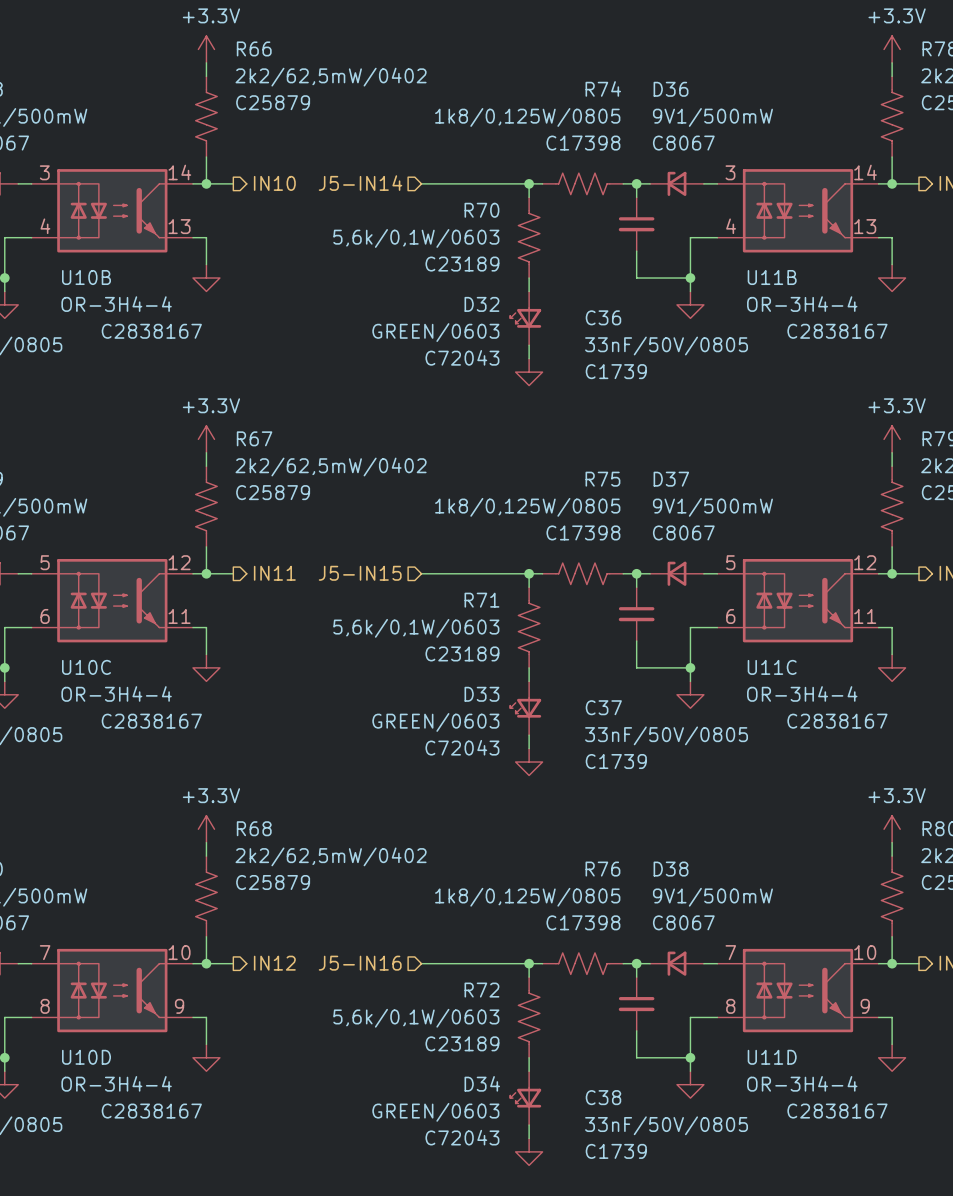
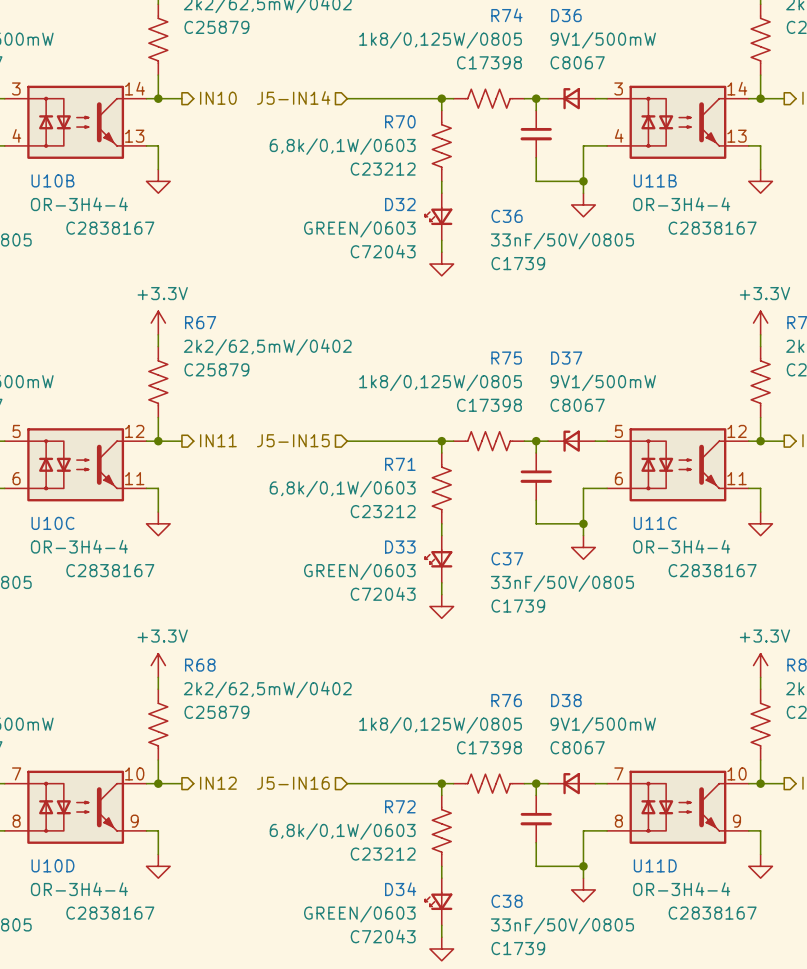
R70 value: 5,6k/0,1W/0603 (416, 238) -> 6,8k/0,1W/0603 (342, 146)
R70 text: C23189 (462, 264) -> C23212 (383, 169)
R71 value: 5,6k/0,1W/0603 (416, 628) -> 6,8k/0,1W/0603 (342, 489)
R71 text: C23189 (462, 653) -> C23212 (383, 511)
R72 value: 5,6k/0,1W/0603 (416, 1018) -> 6,8k/0,1W/0603 (342, 831)
R72 text: C23189 (462, 1043) -> C23212 (383, 854)

